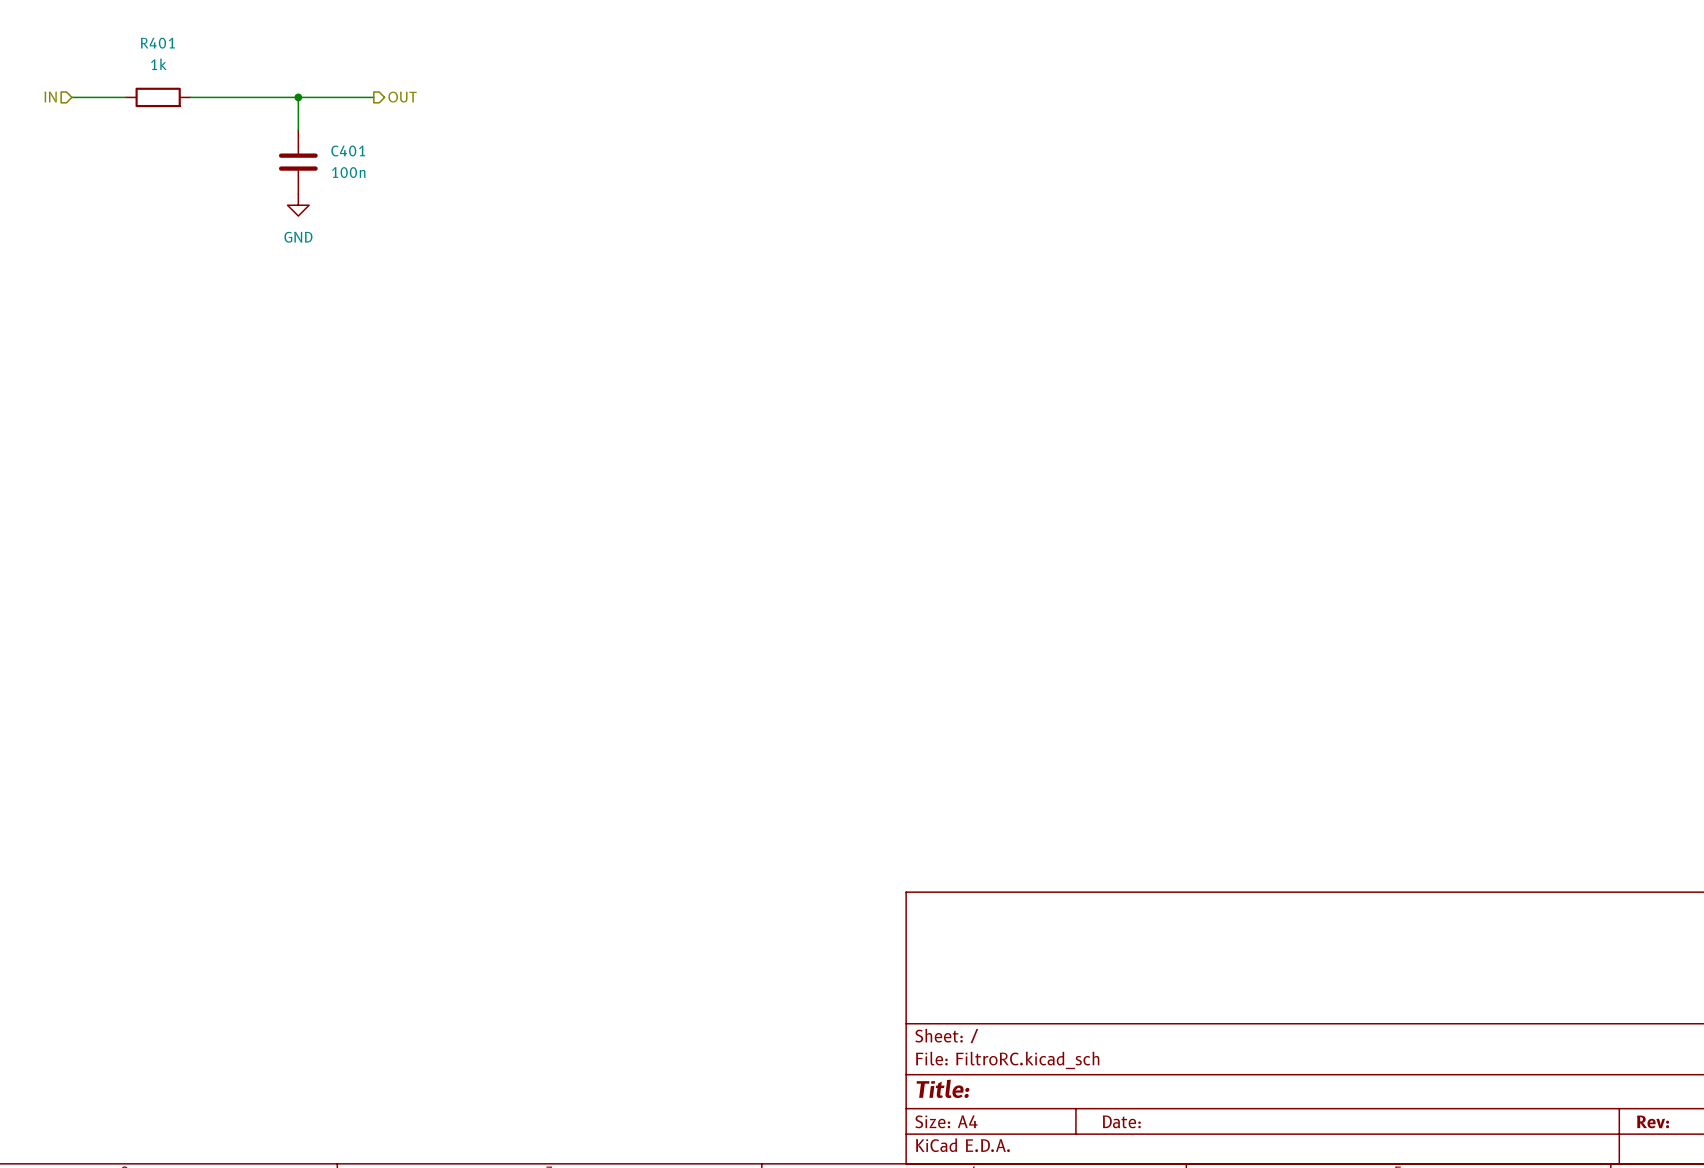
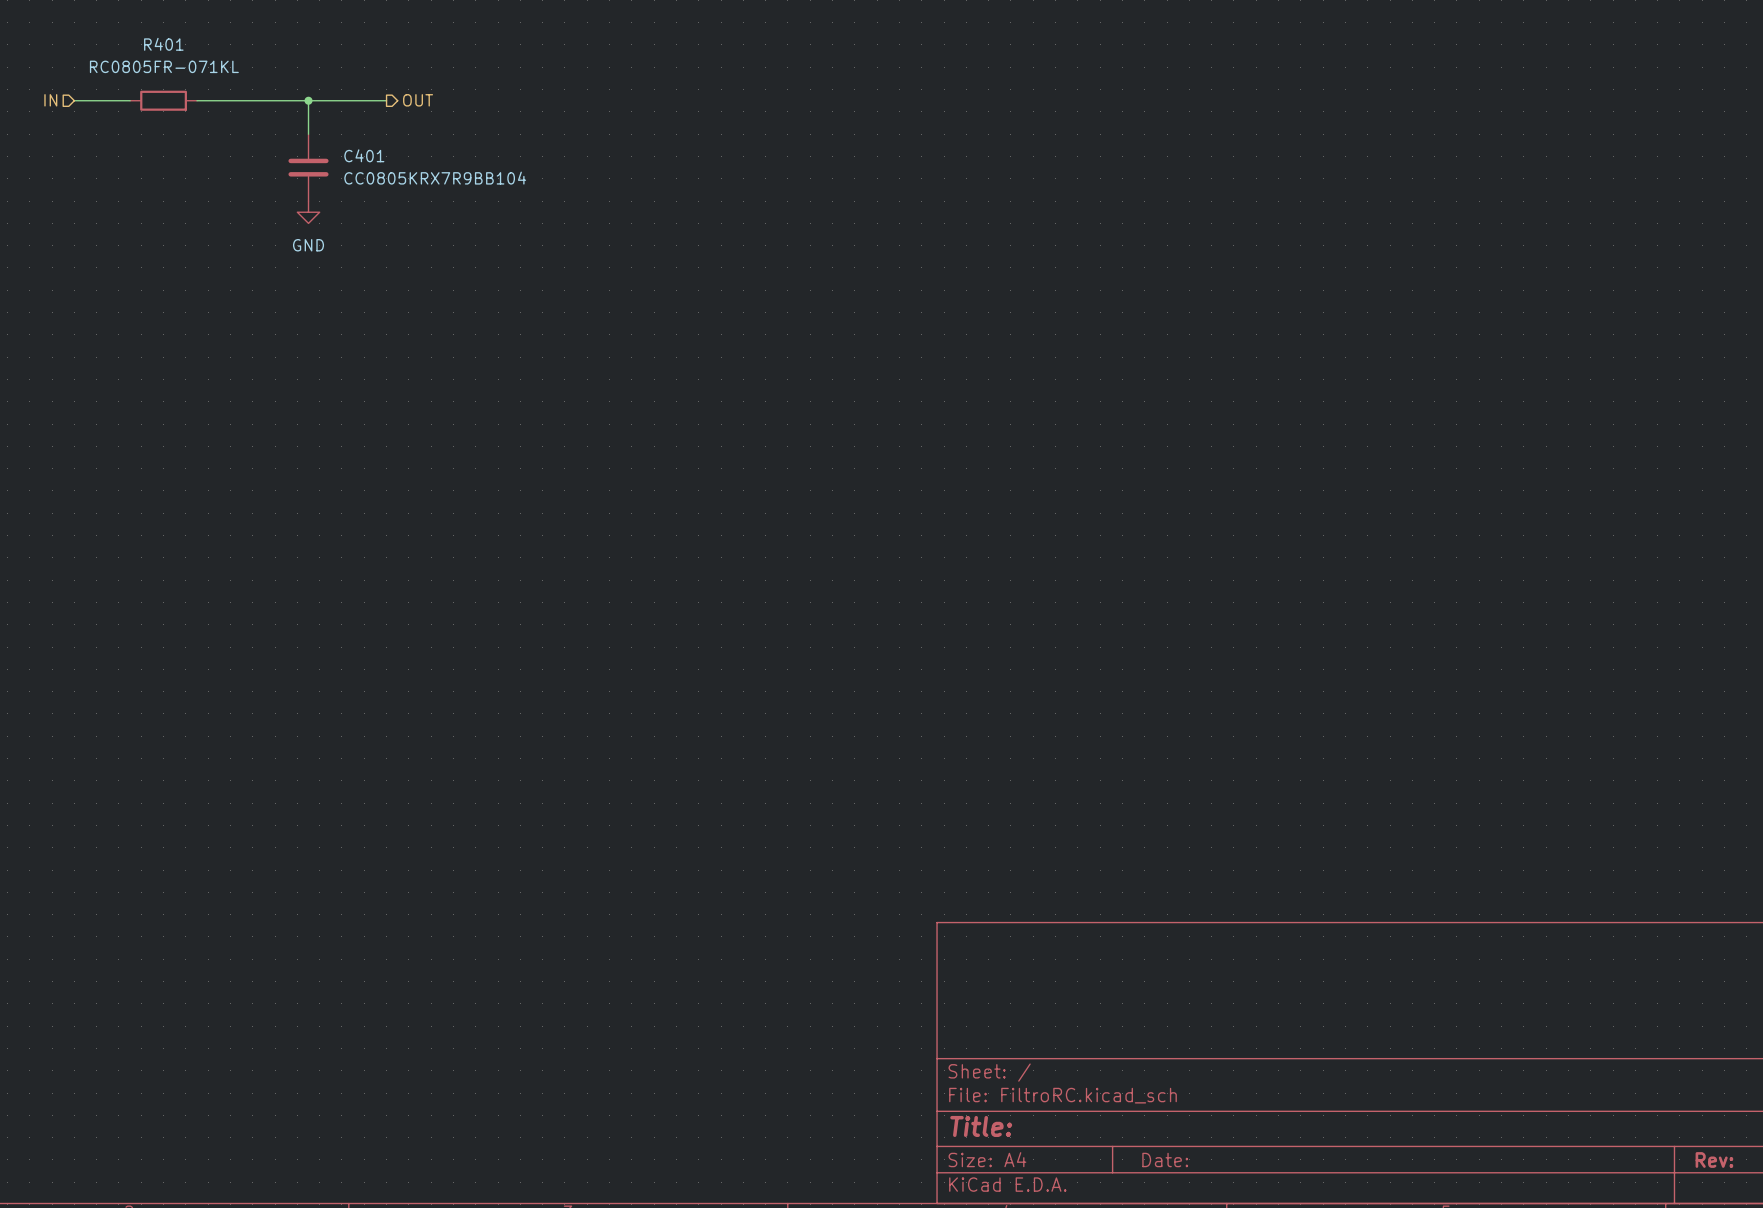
R401 value: 1k (158, 64) -> RC0805FR-071KL (164, 66)
C401 value: 100n (348, 172) -> CC0805KRX7R9BB104 (435, 178)

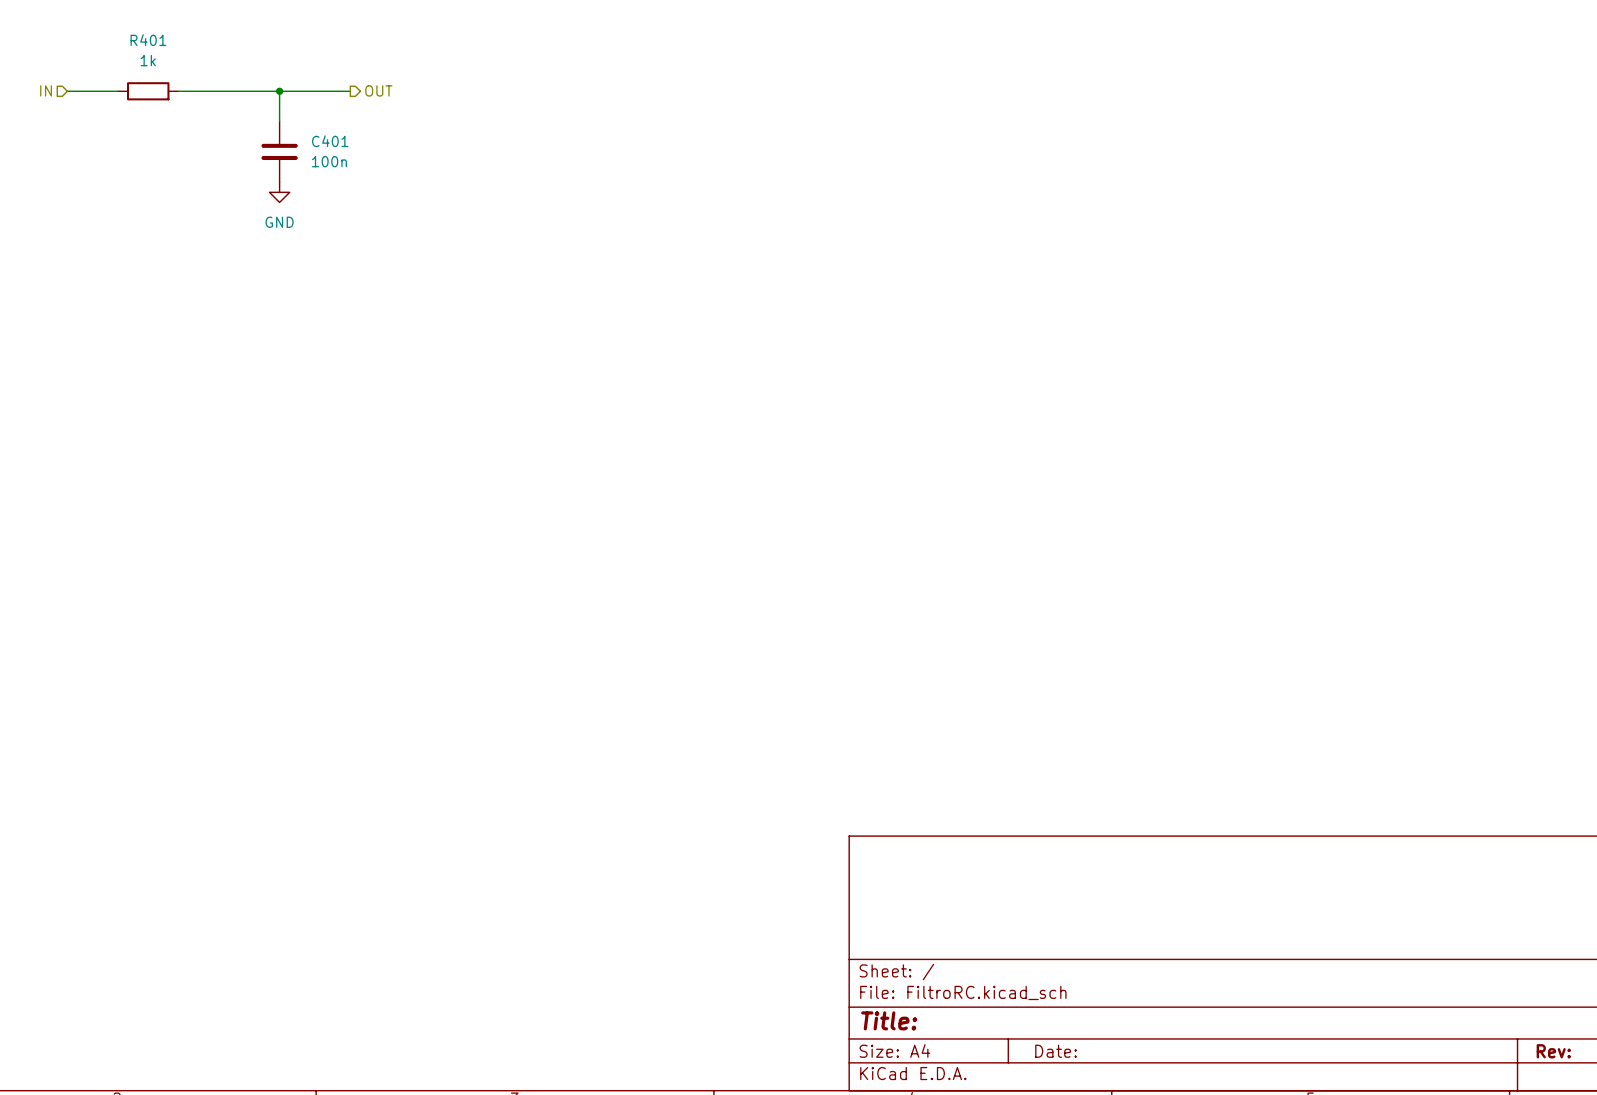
R401 value: RC0805FR-071KL (164, 66) -> 1k (148, 60)
C401 value: CC0805KRX7R9BB104 (435, 178) -> 100n (329, 161)

